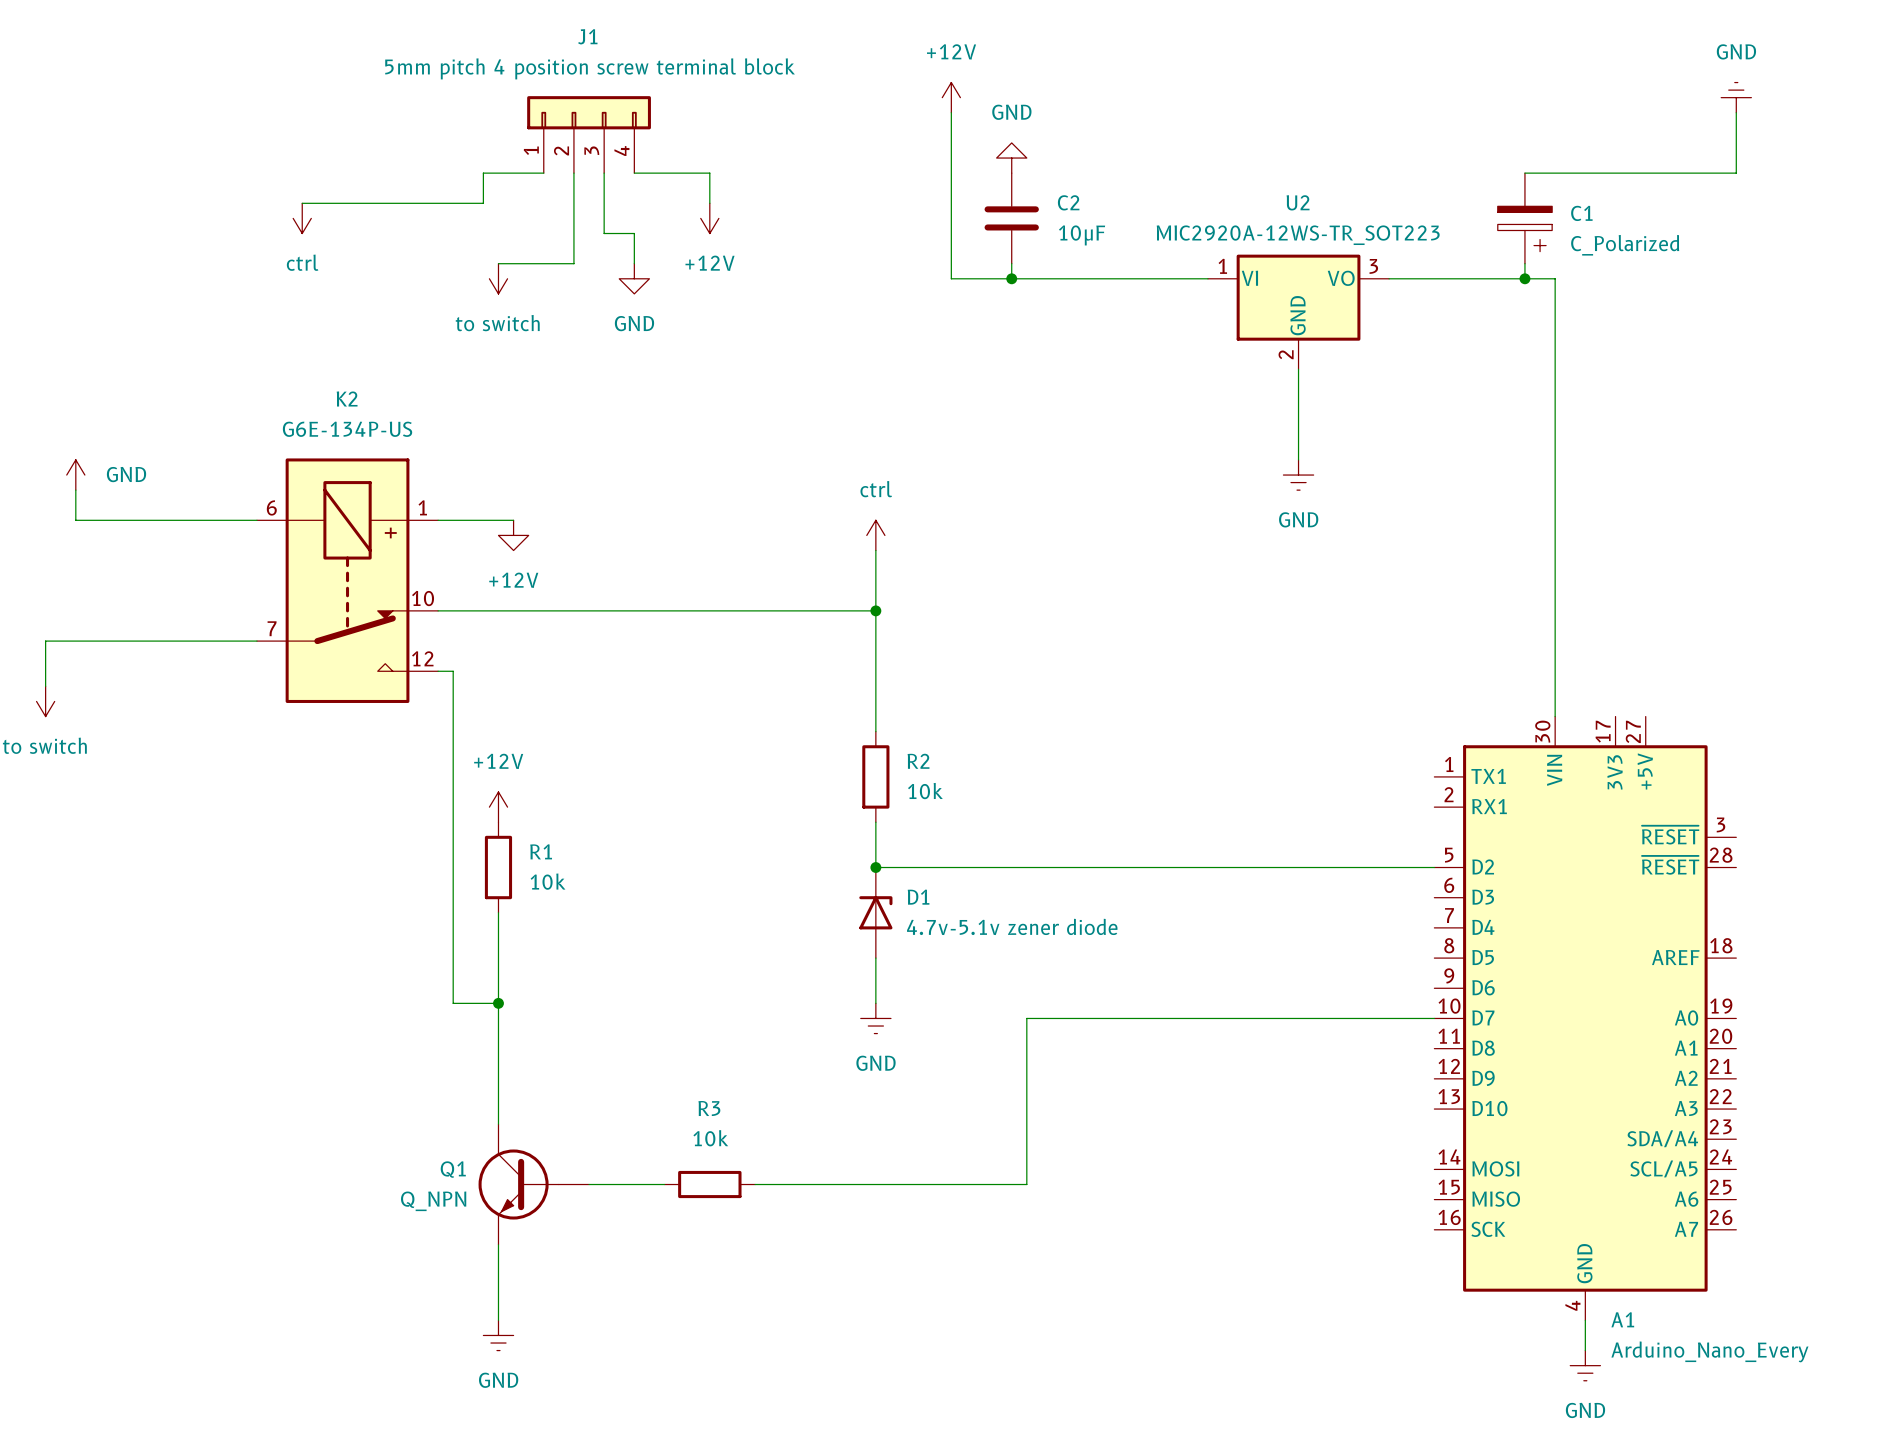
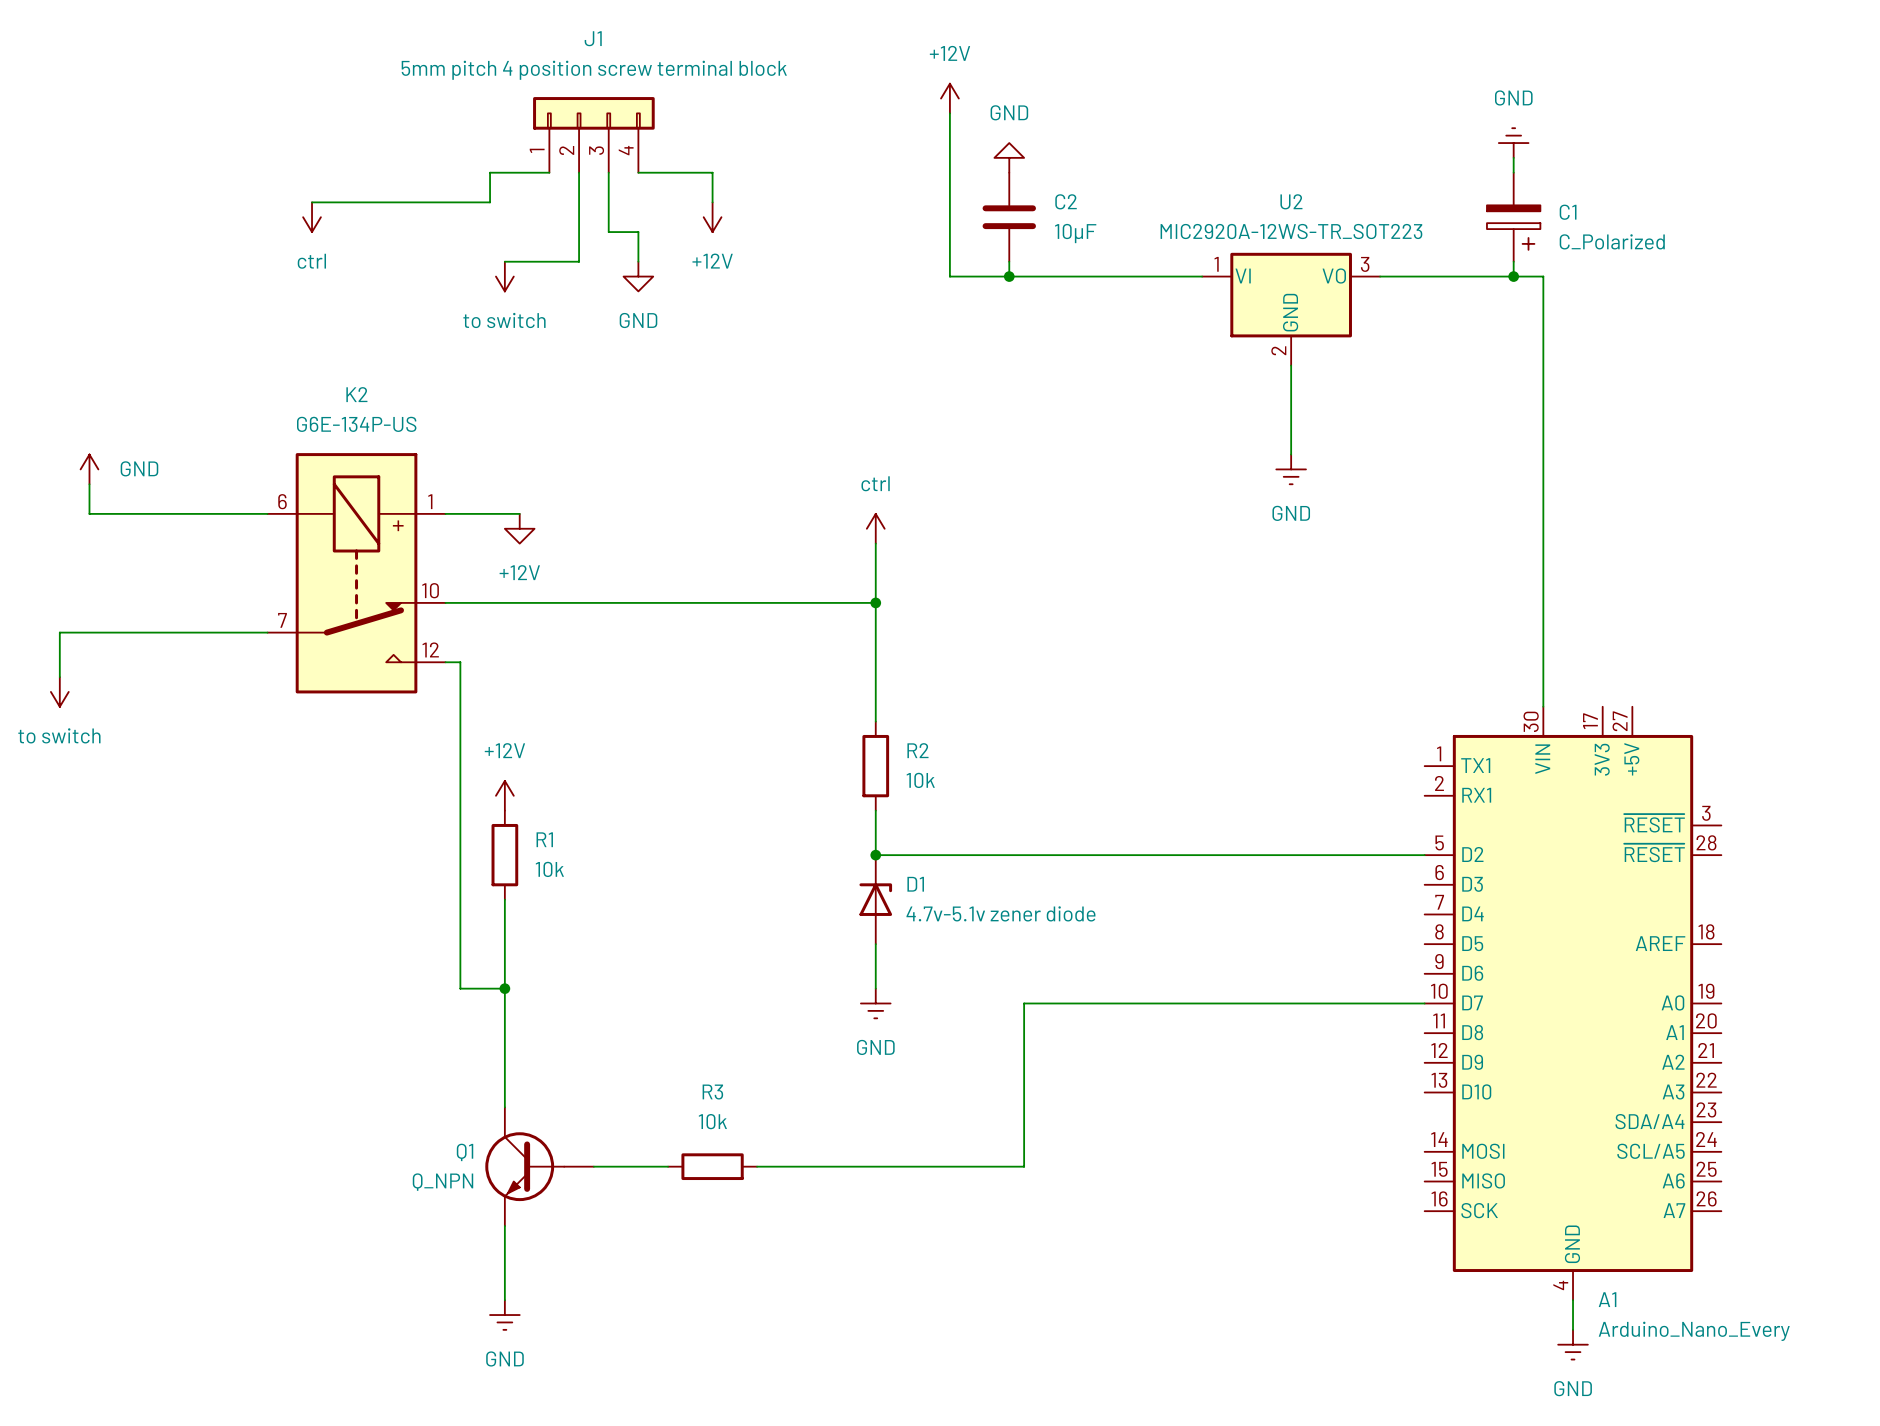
power symbol position: GND (1736, 97) -> GND (1513, 143)
wire: (1736, 112) (1736, 173) (1524, 173) -> (1513, 157) (1513, 172)

